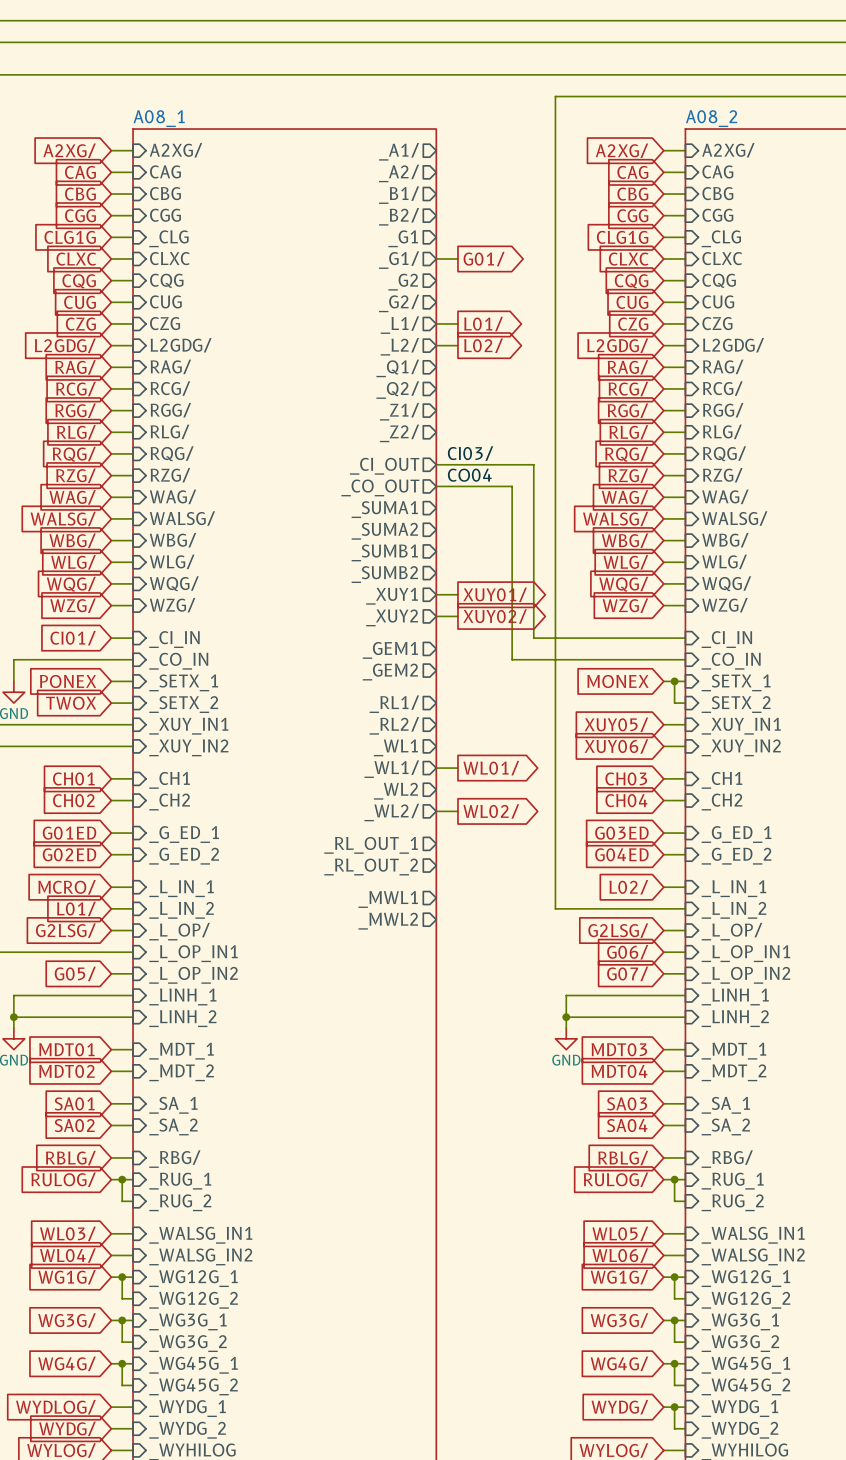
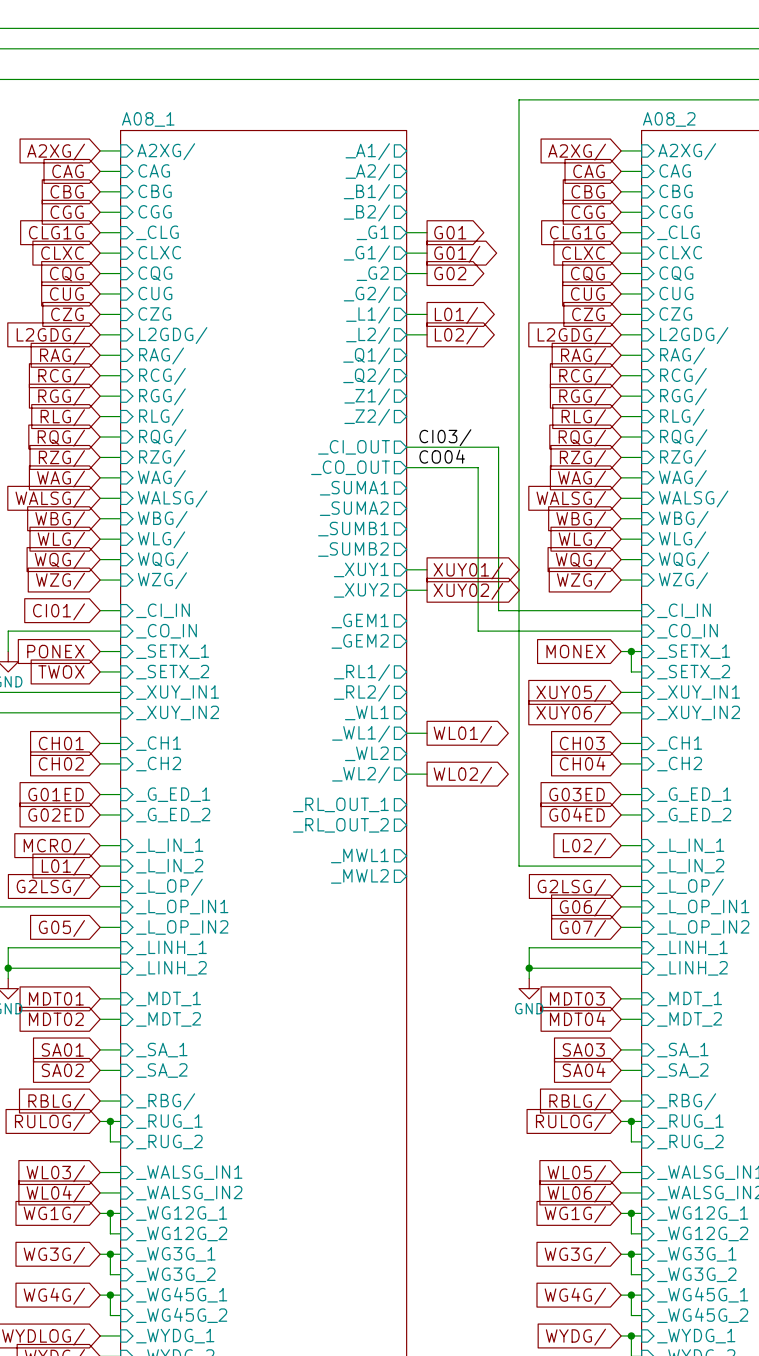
wire: none -> (406, 232) (427, 232)
global label: none -> G01 (450, 232)
wire: none -> (406, 273) (427, 273)
global label: none -> G02 (450, 273)

